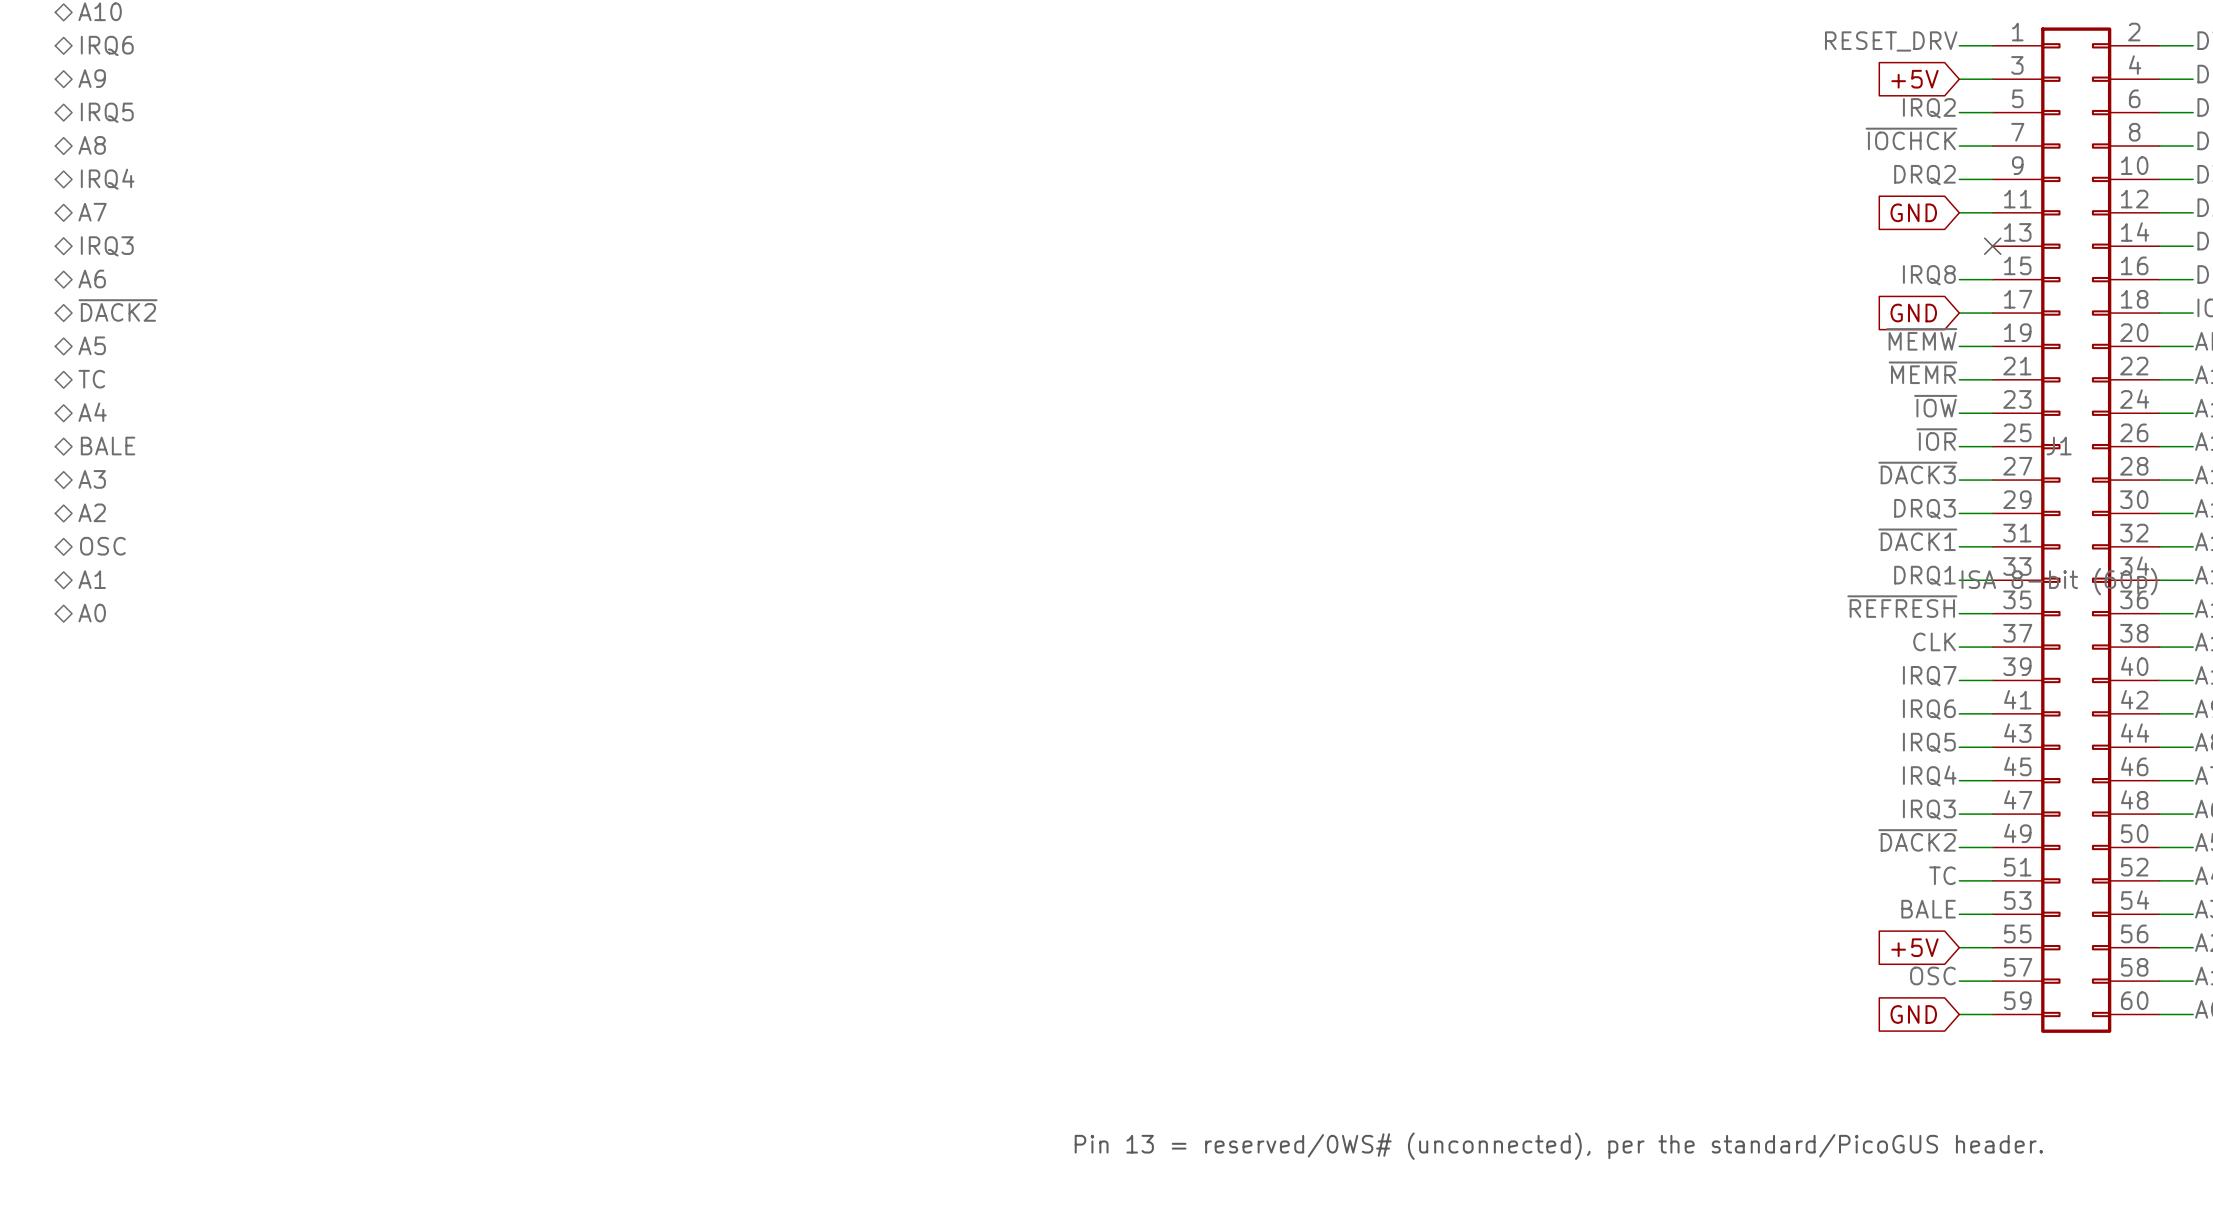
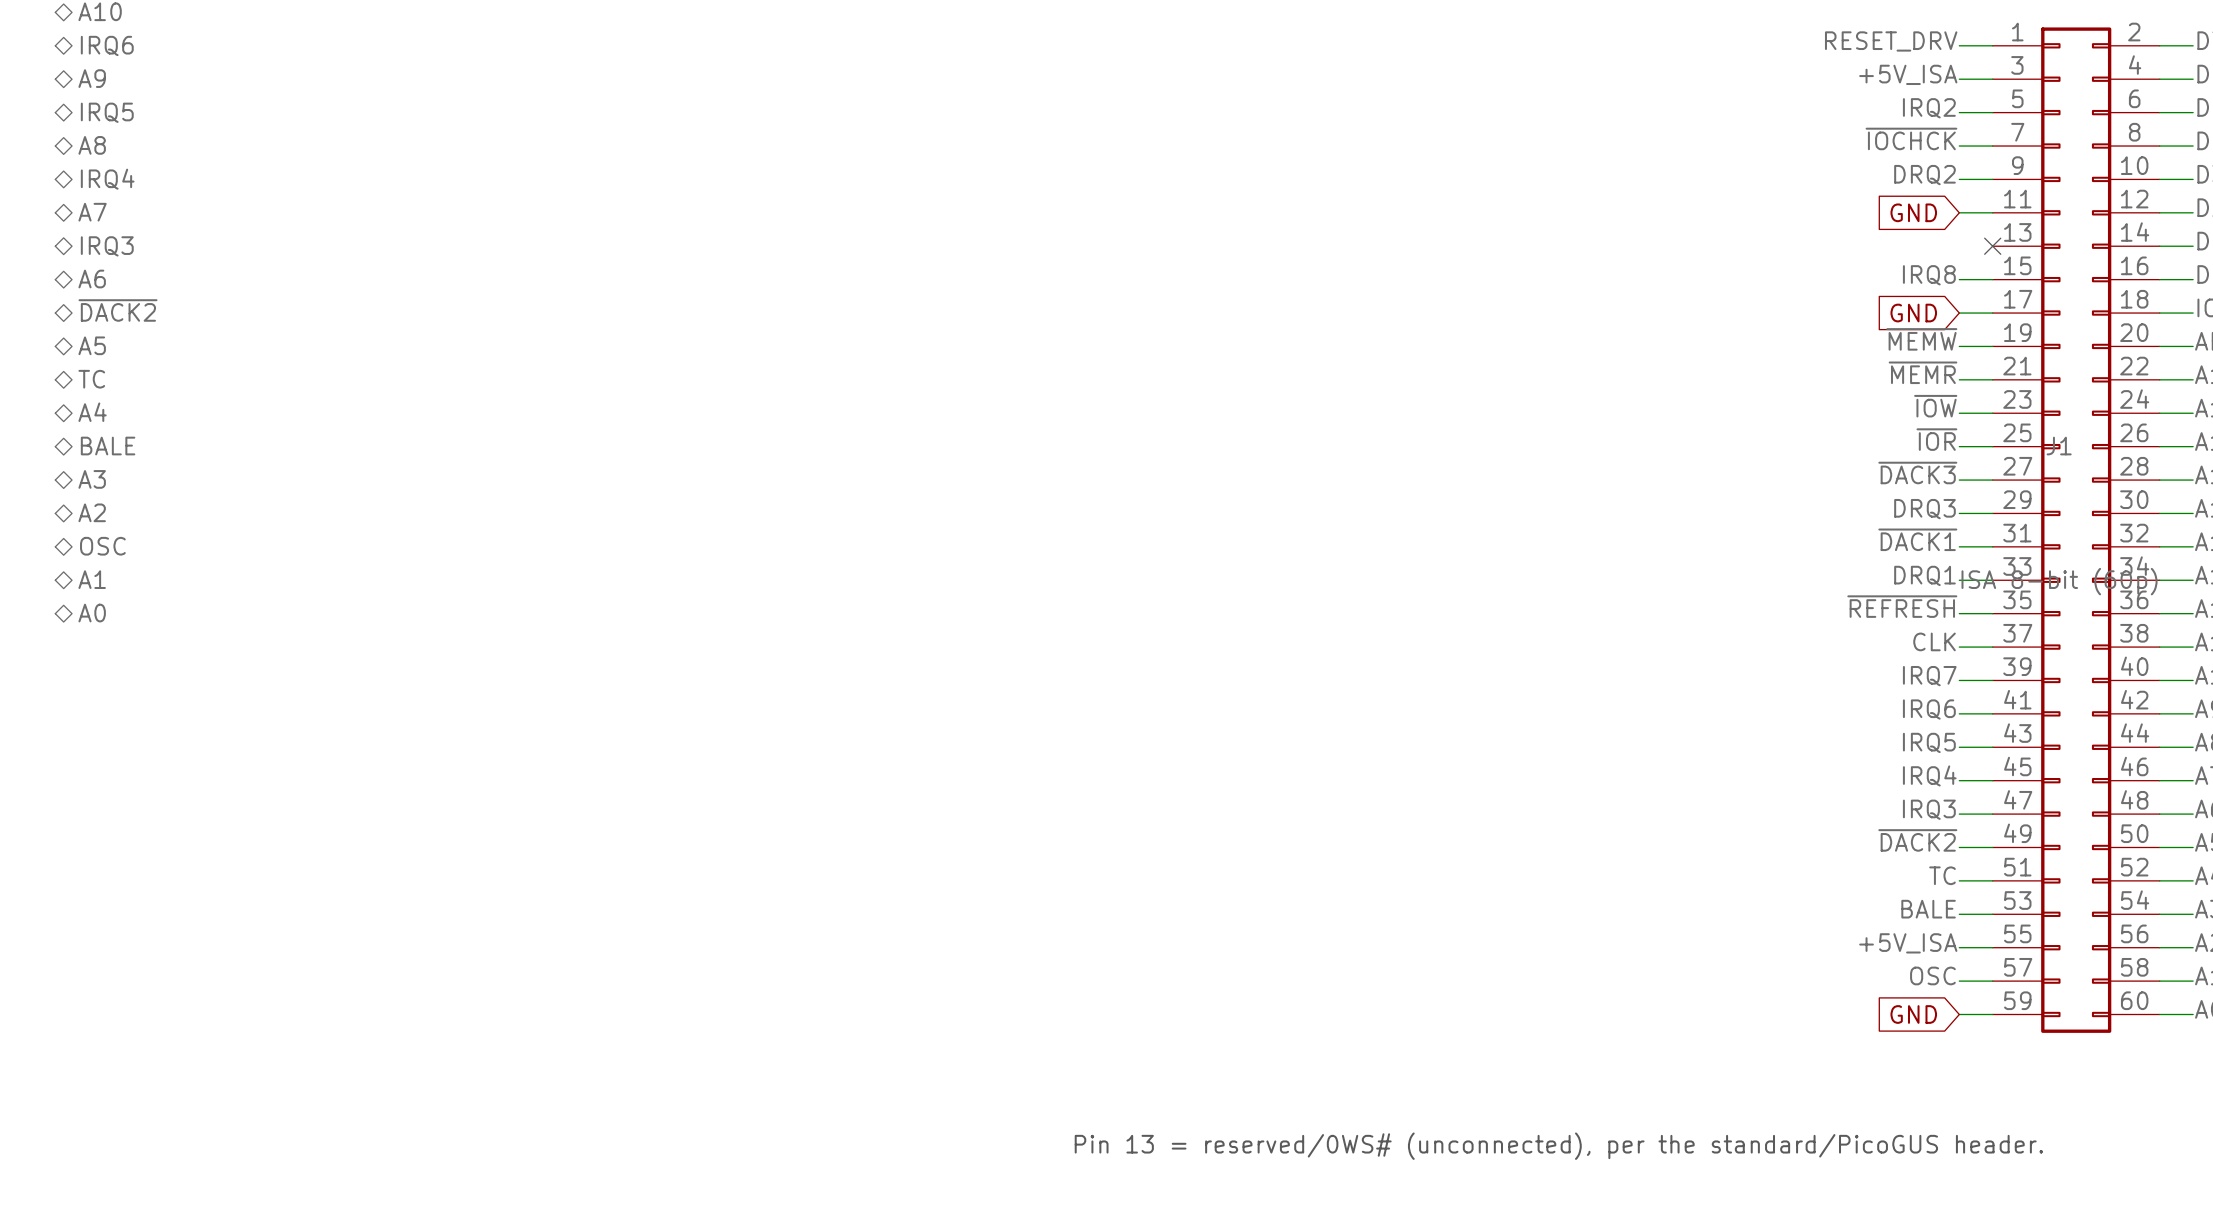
label: none -> +5V_ISA (1908, 74)
global label: +5V (1914, 79) -> none
label: none -> +5V_ISA (1908, 943)
global label: +5V (1914, 947) -> none

